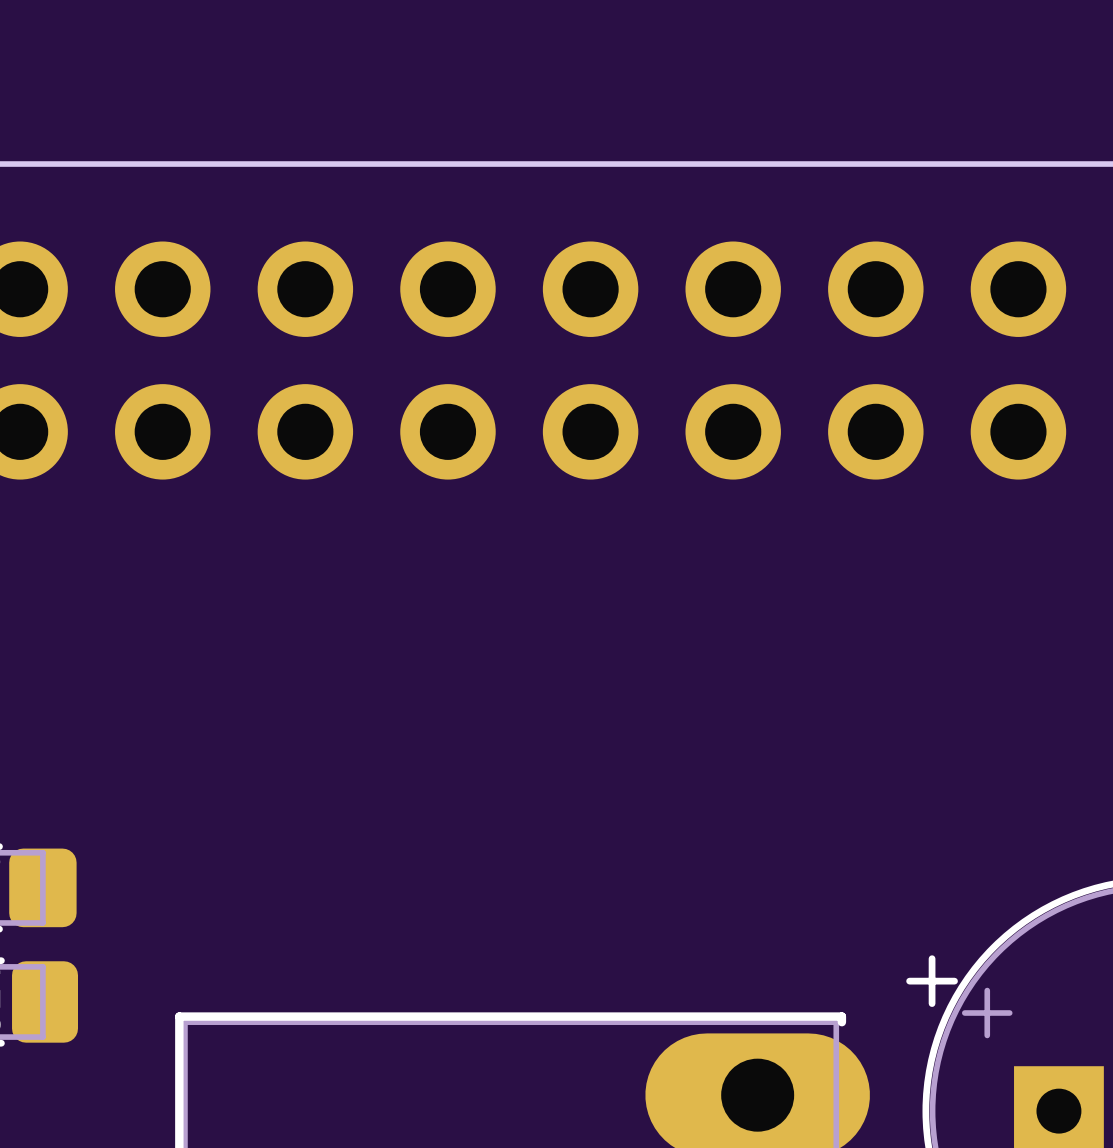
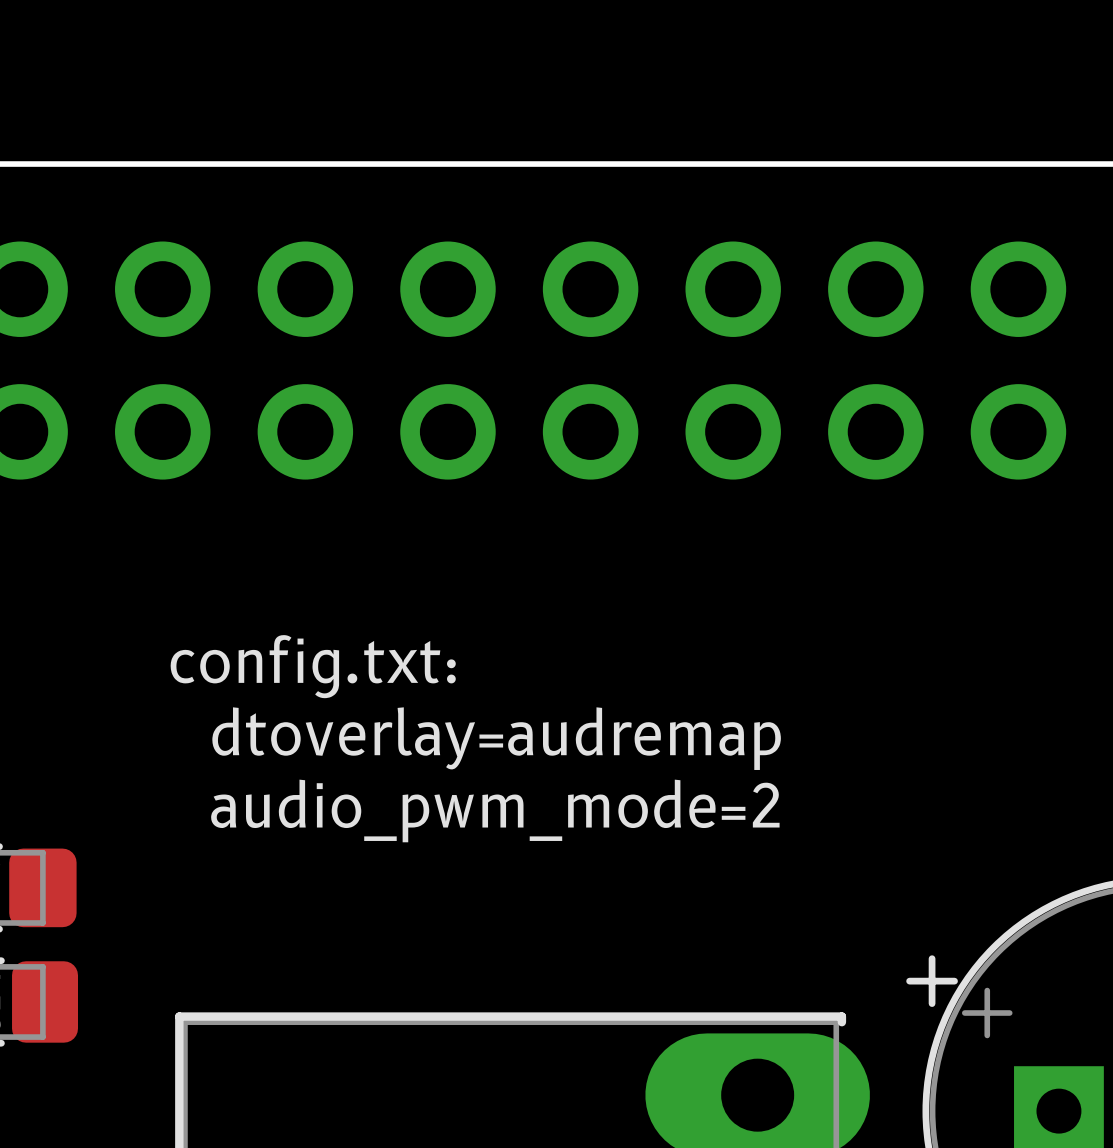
text: none -> config.txt: (313, 666)
text: none -> dtoverlay=audremap (496, 738)
text: none -> audio_pwm_mode=2 (495, 810)

